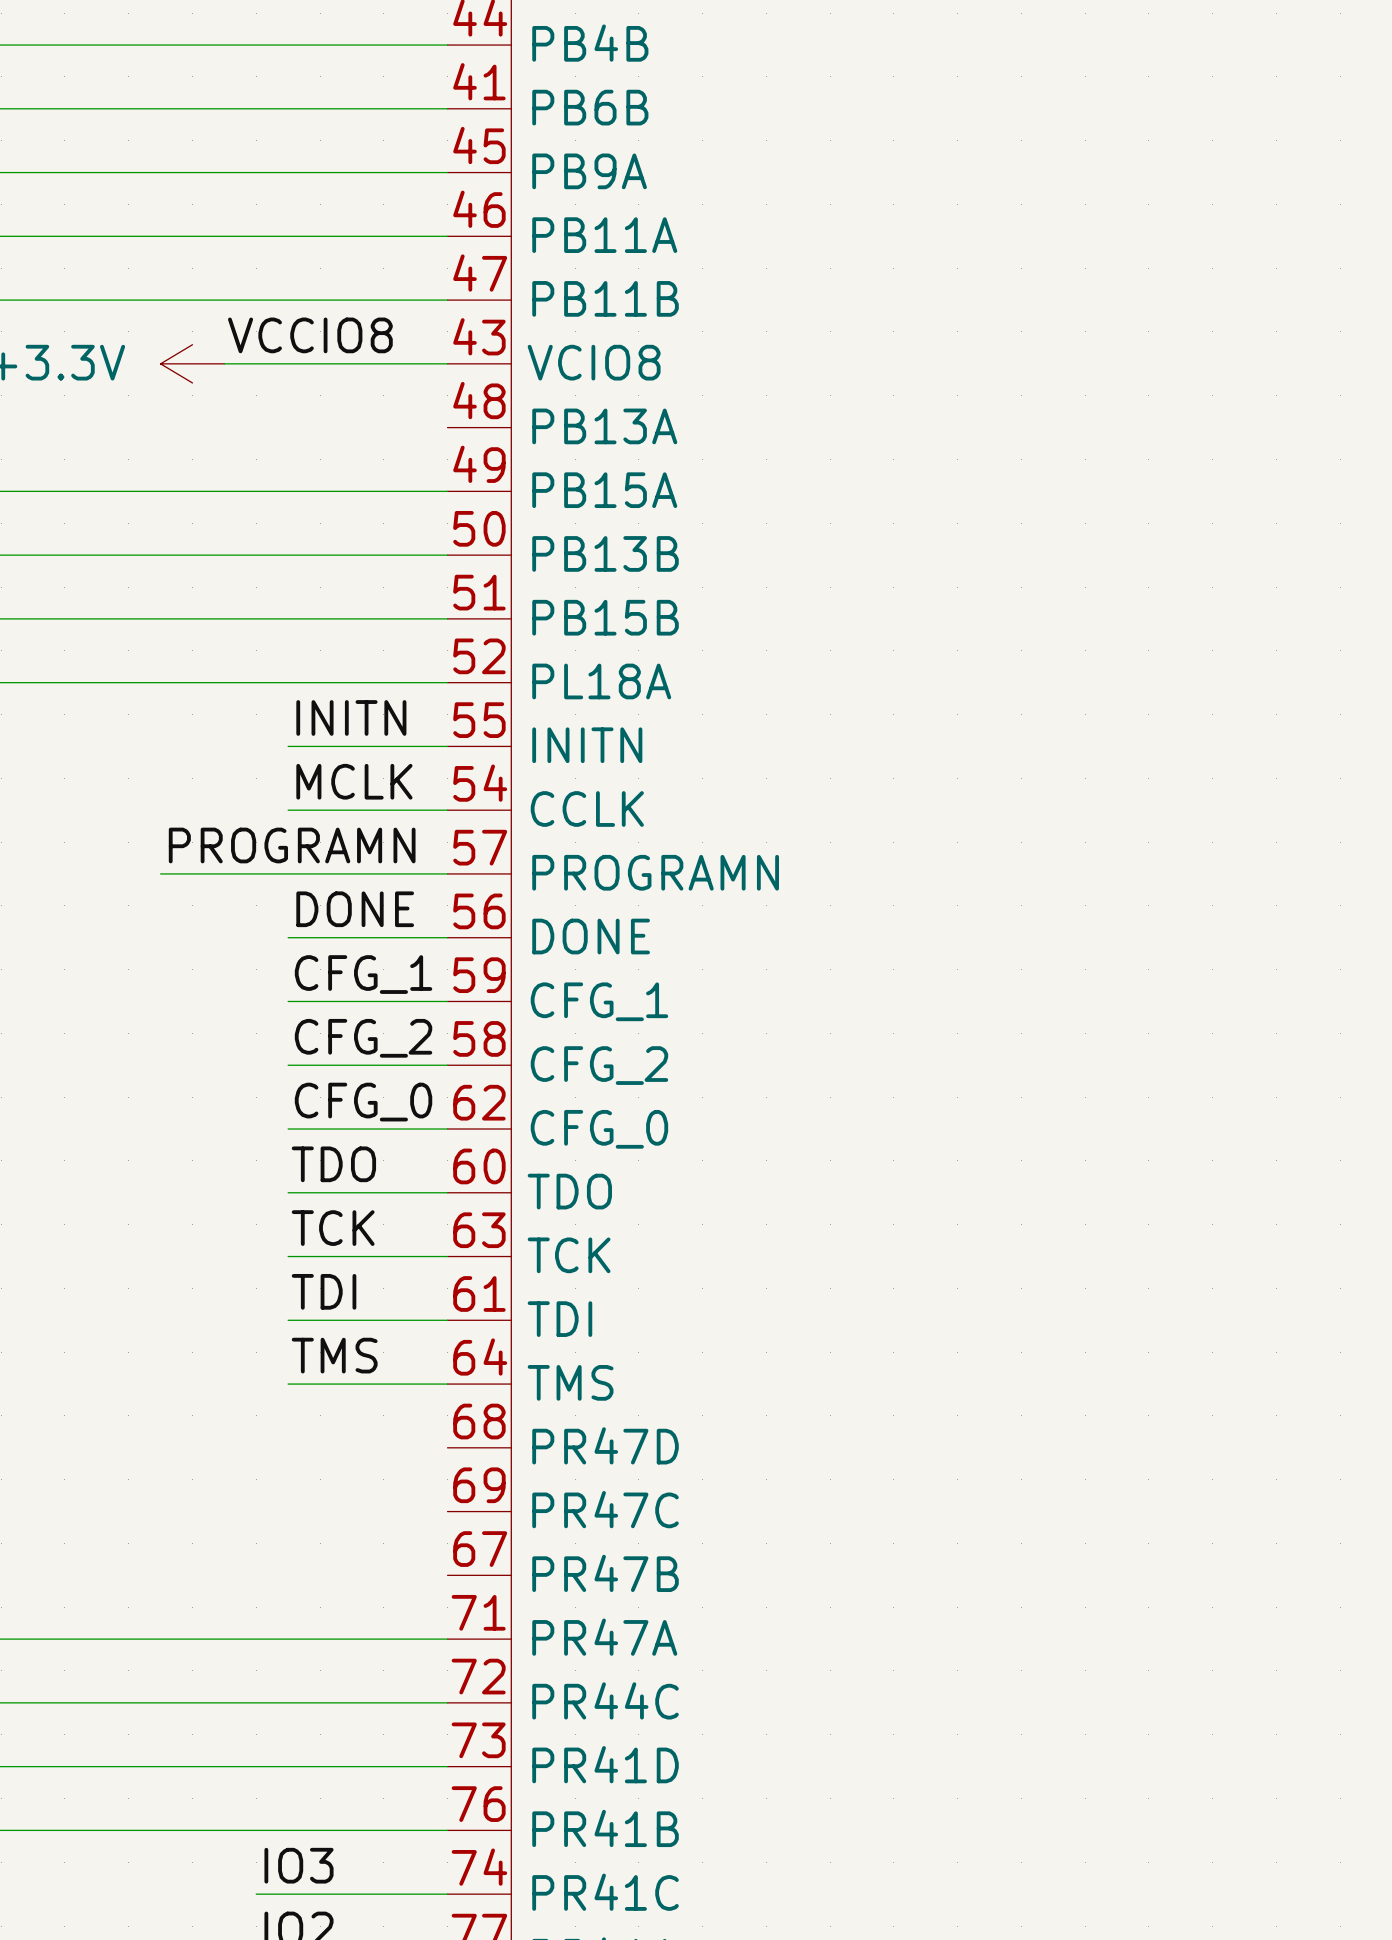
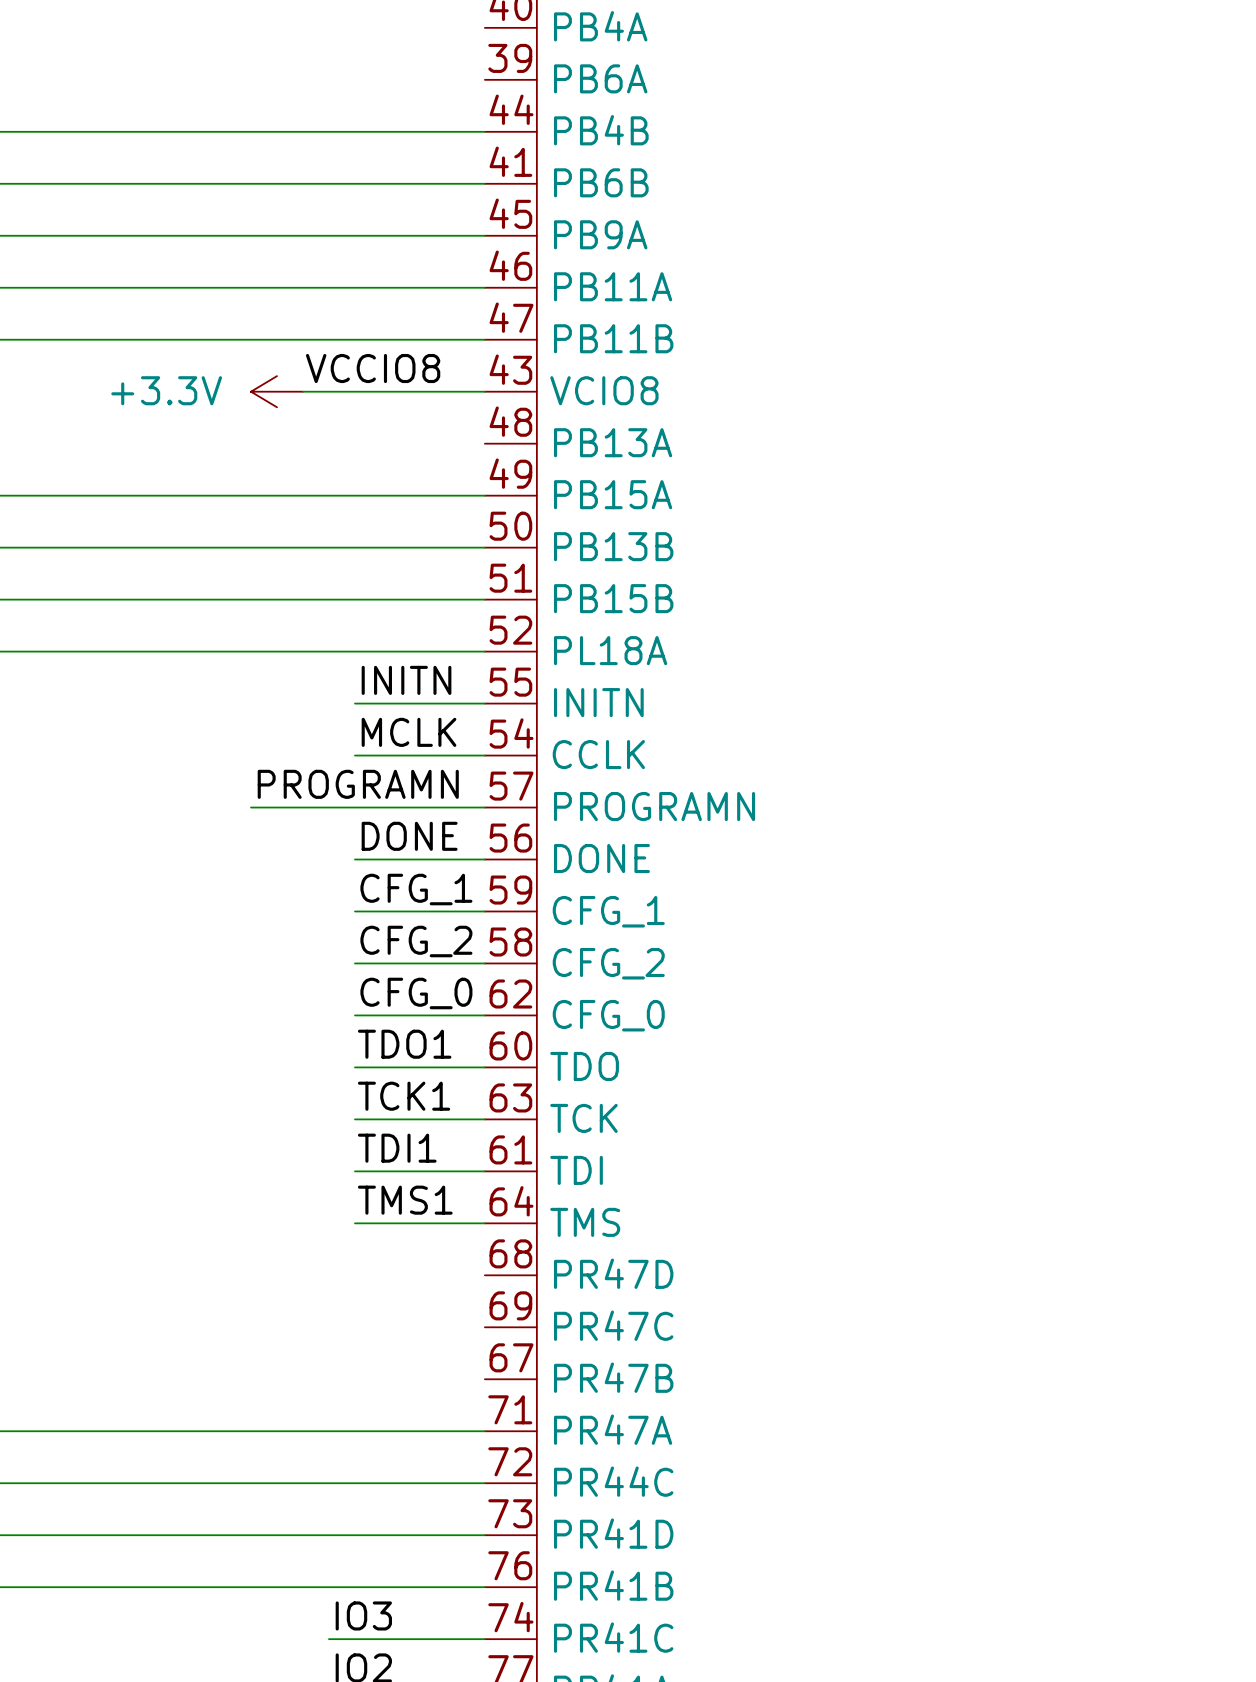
label: TDO (333, 1164) -> TDO1 (404, 1044)
label: TCK (333, 1228) -> TCK1 (404, 1096)
label: TDI (324, 1291) -> TDI1 (397, 1148)
label: TMS (334, 1355) -> TMS1 (405, 1200)

